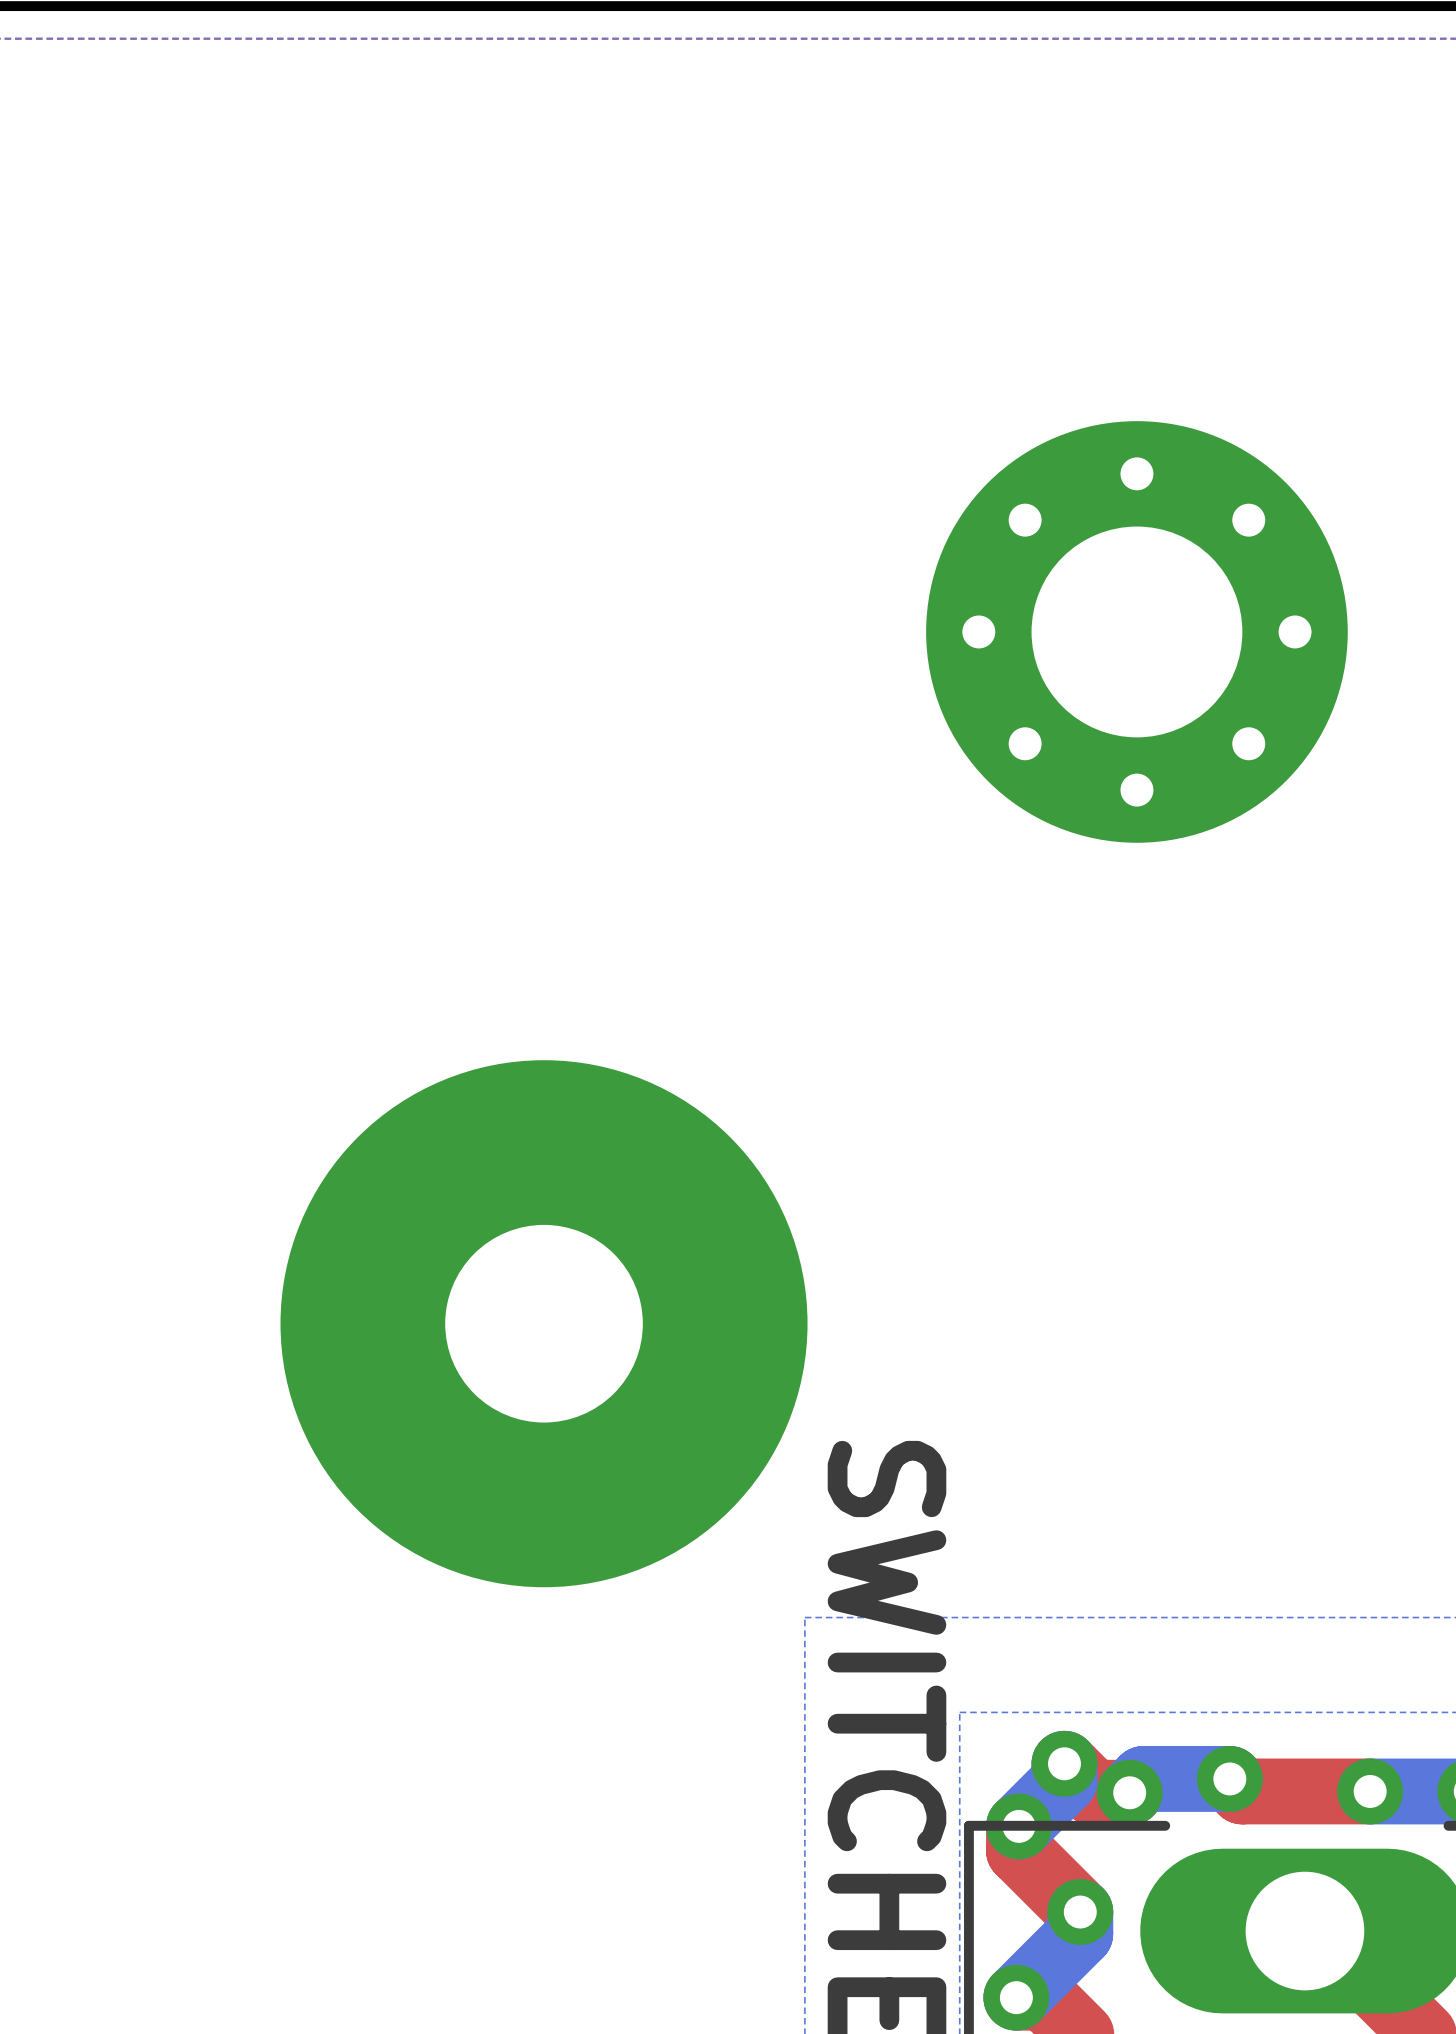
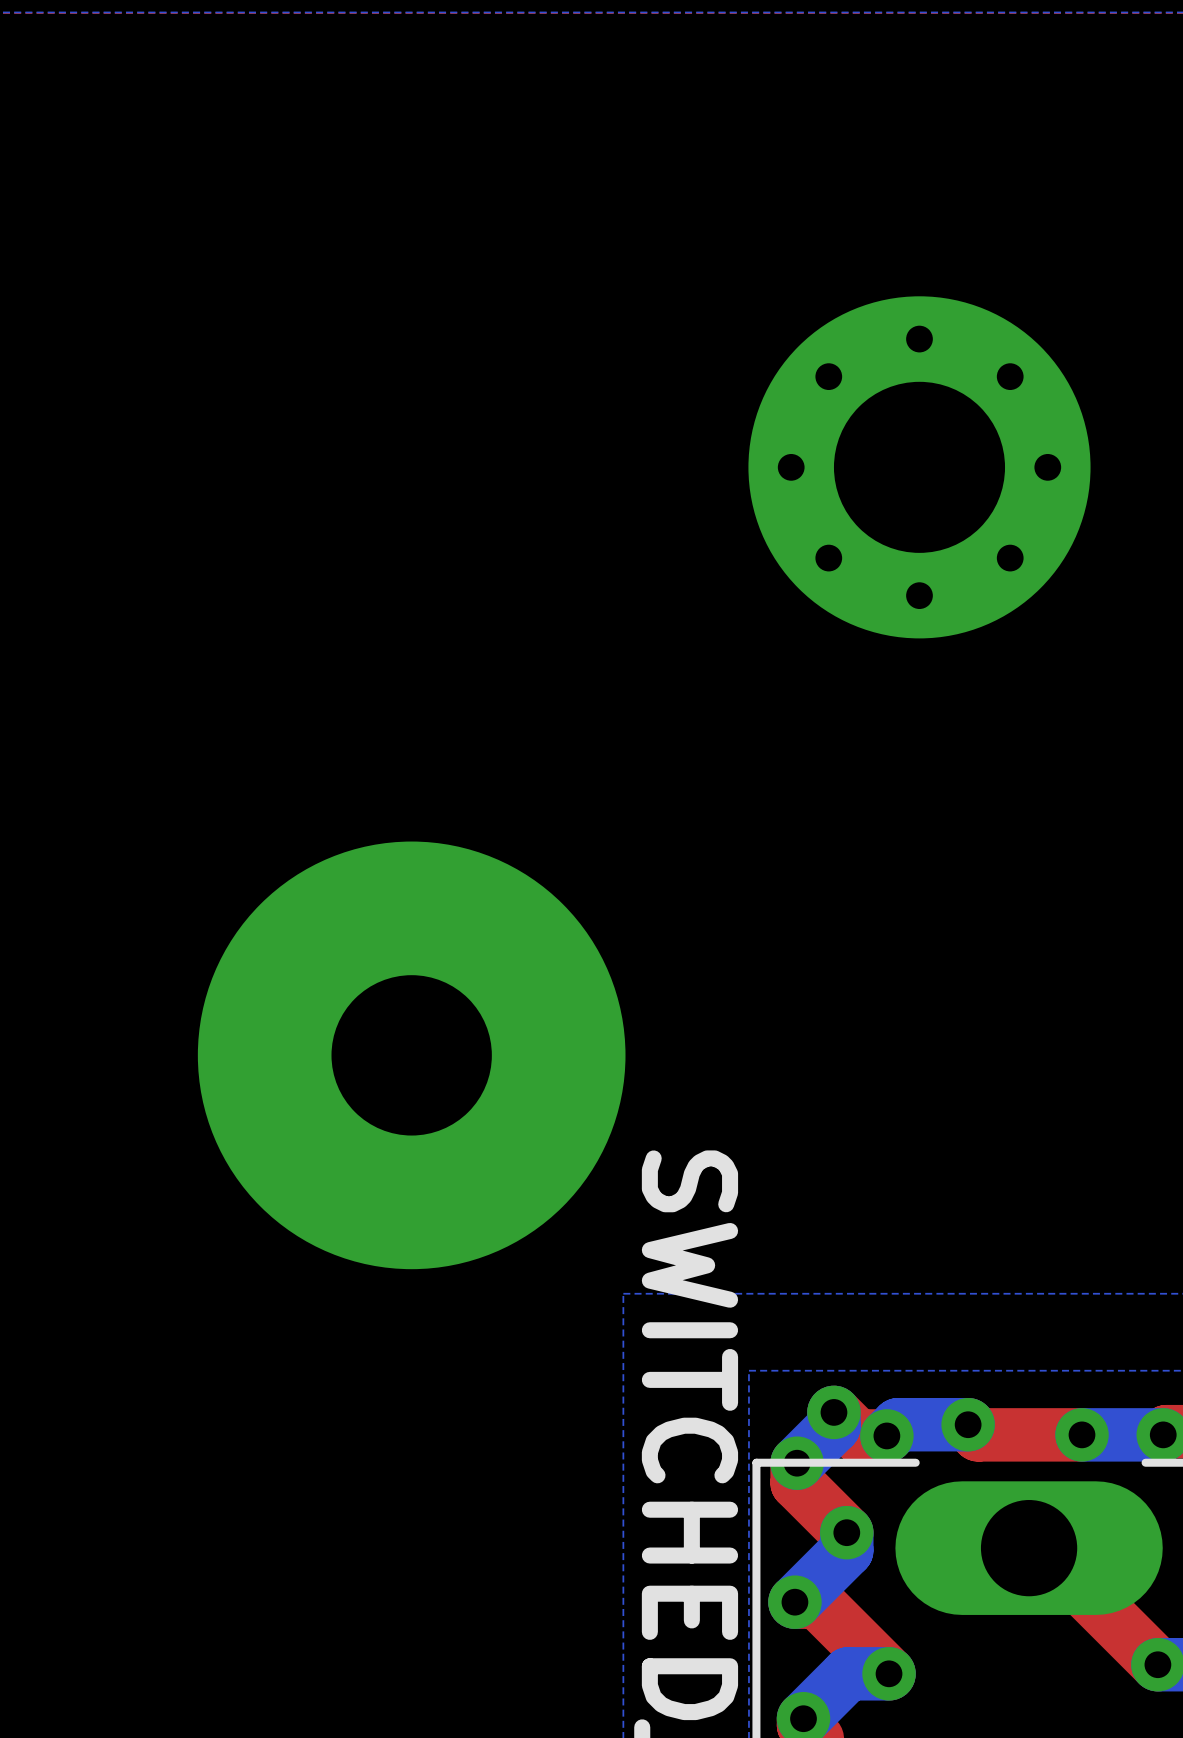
part position: (1136, 631) -> (919, 467)

